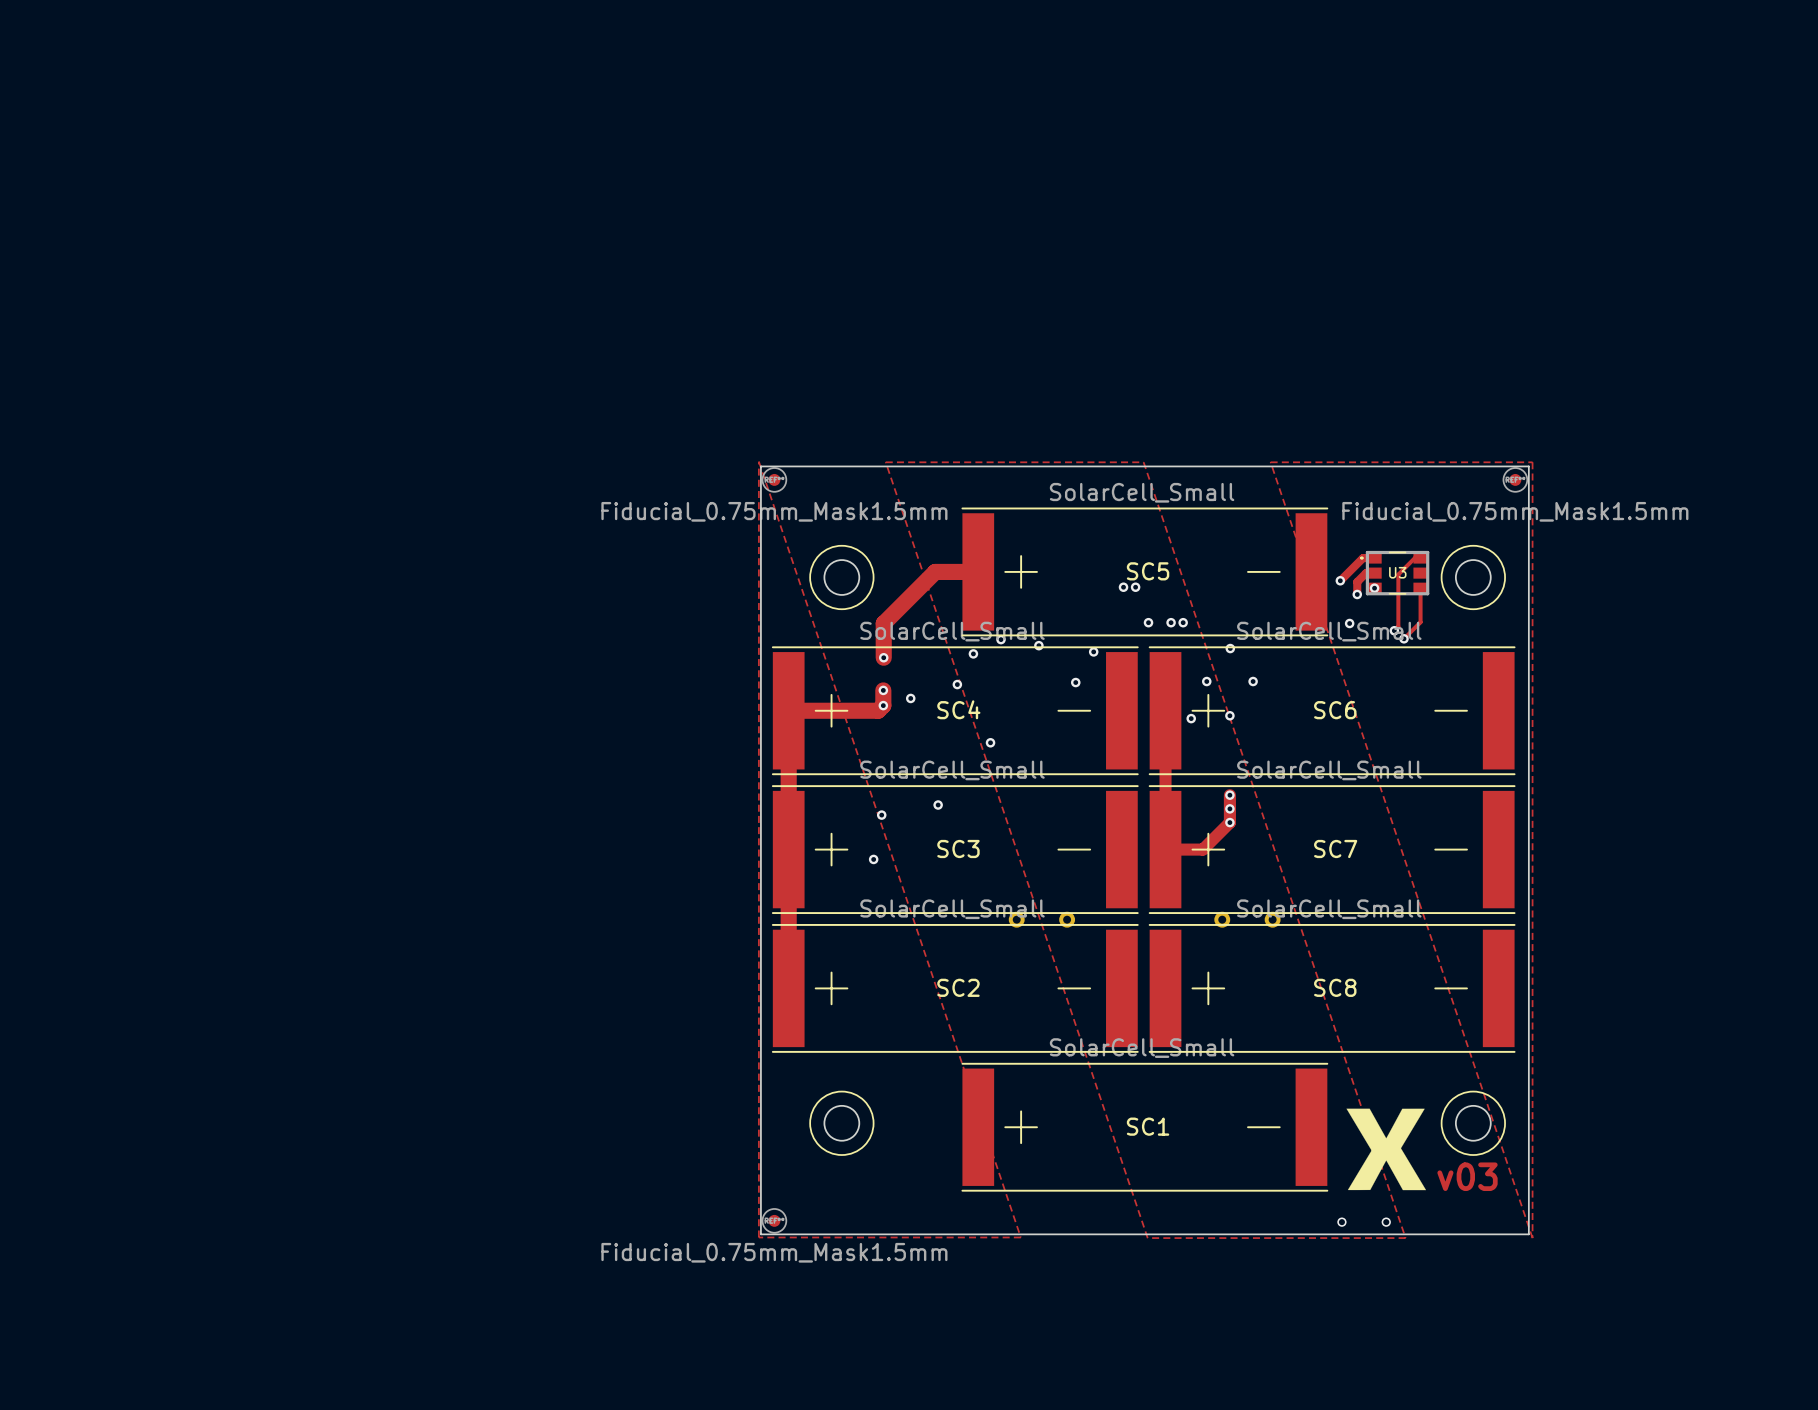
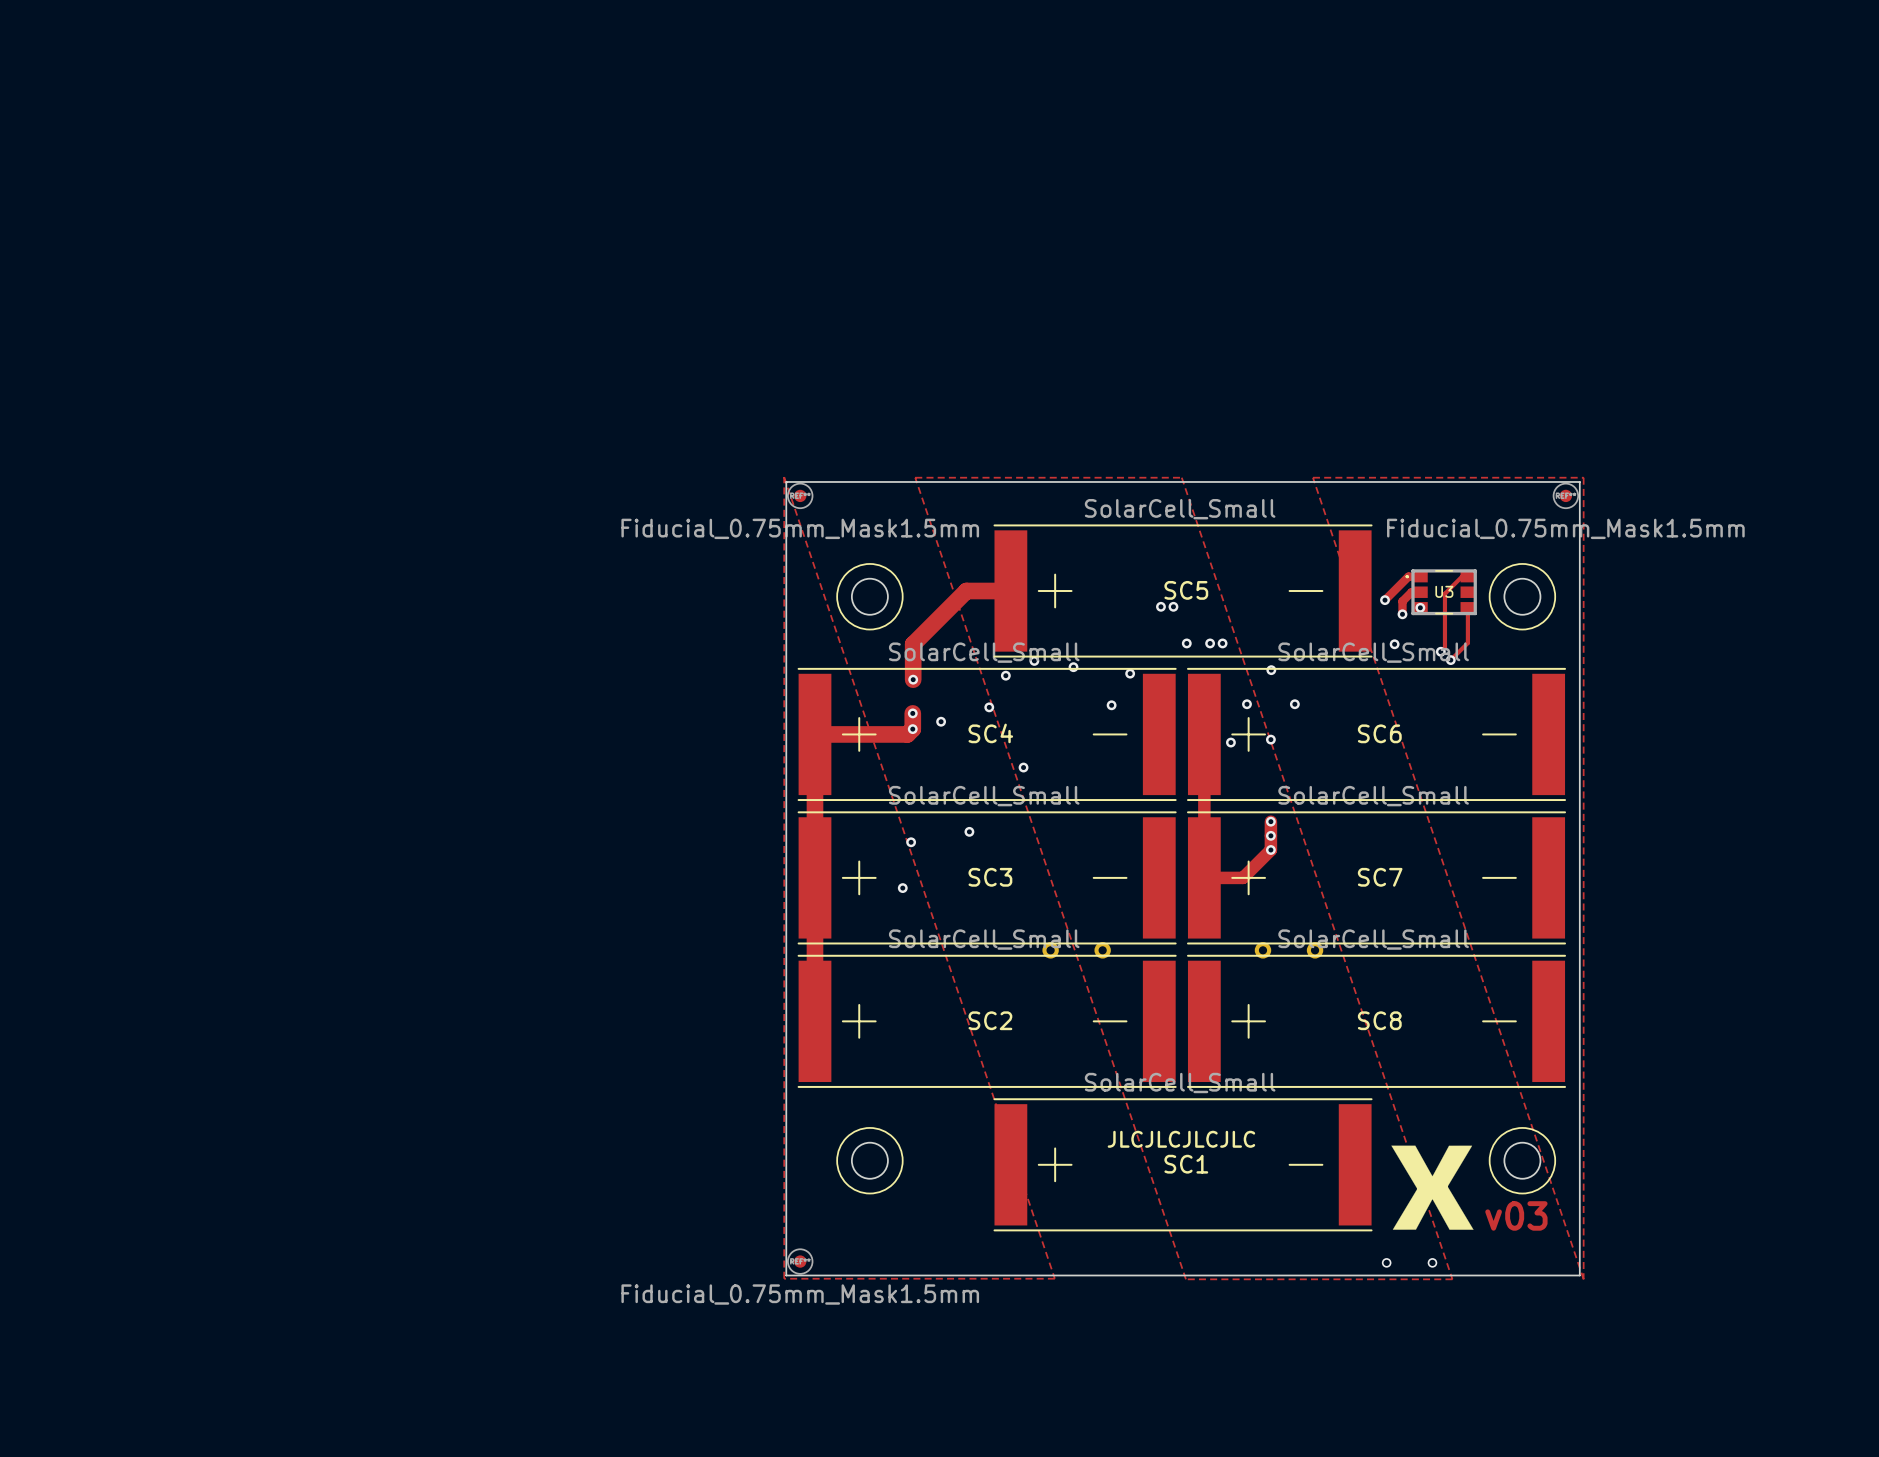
text: none -> JLCJLCJLCJLC (1181, 1139)

